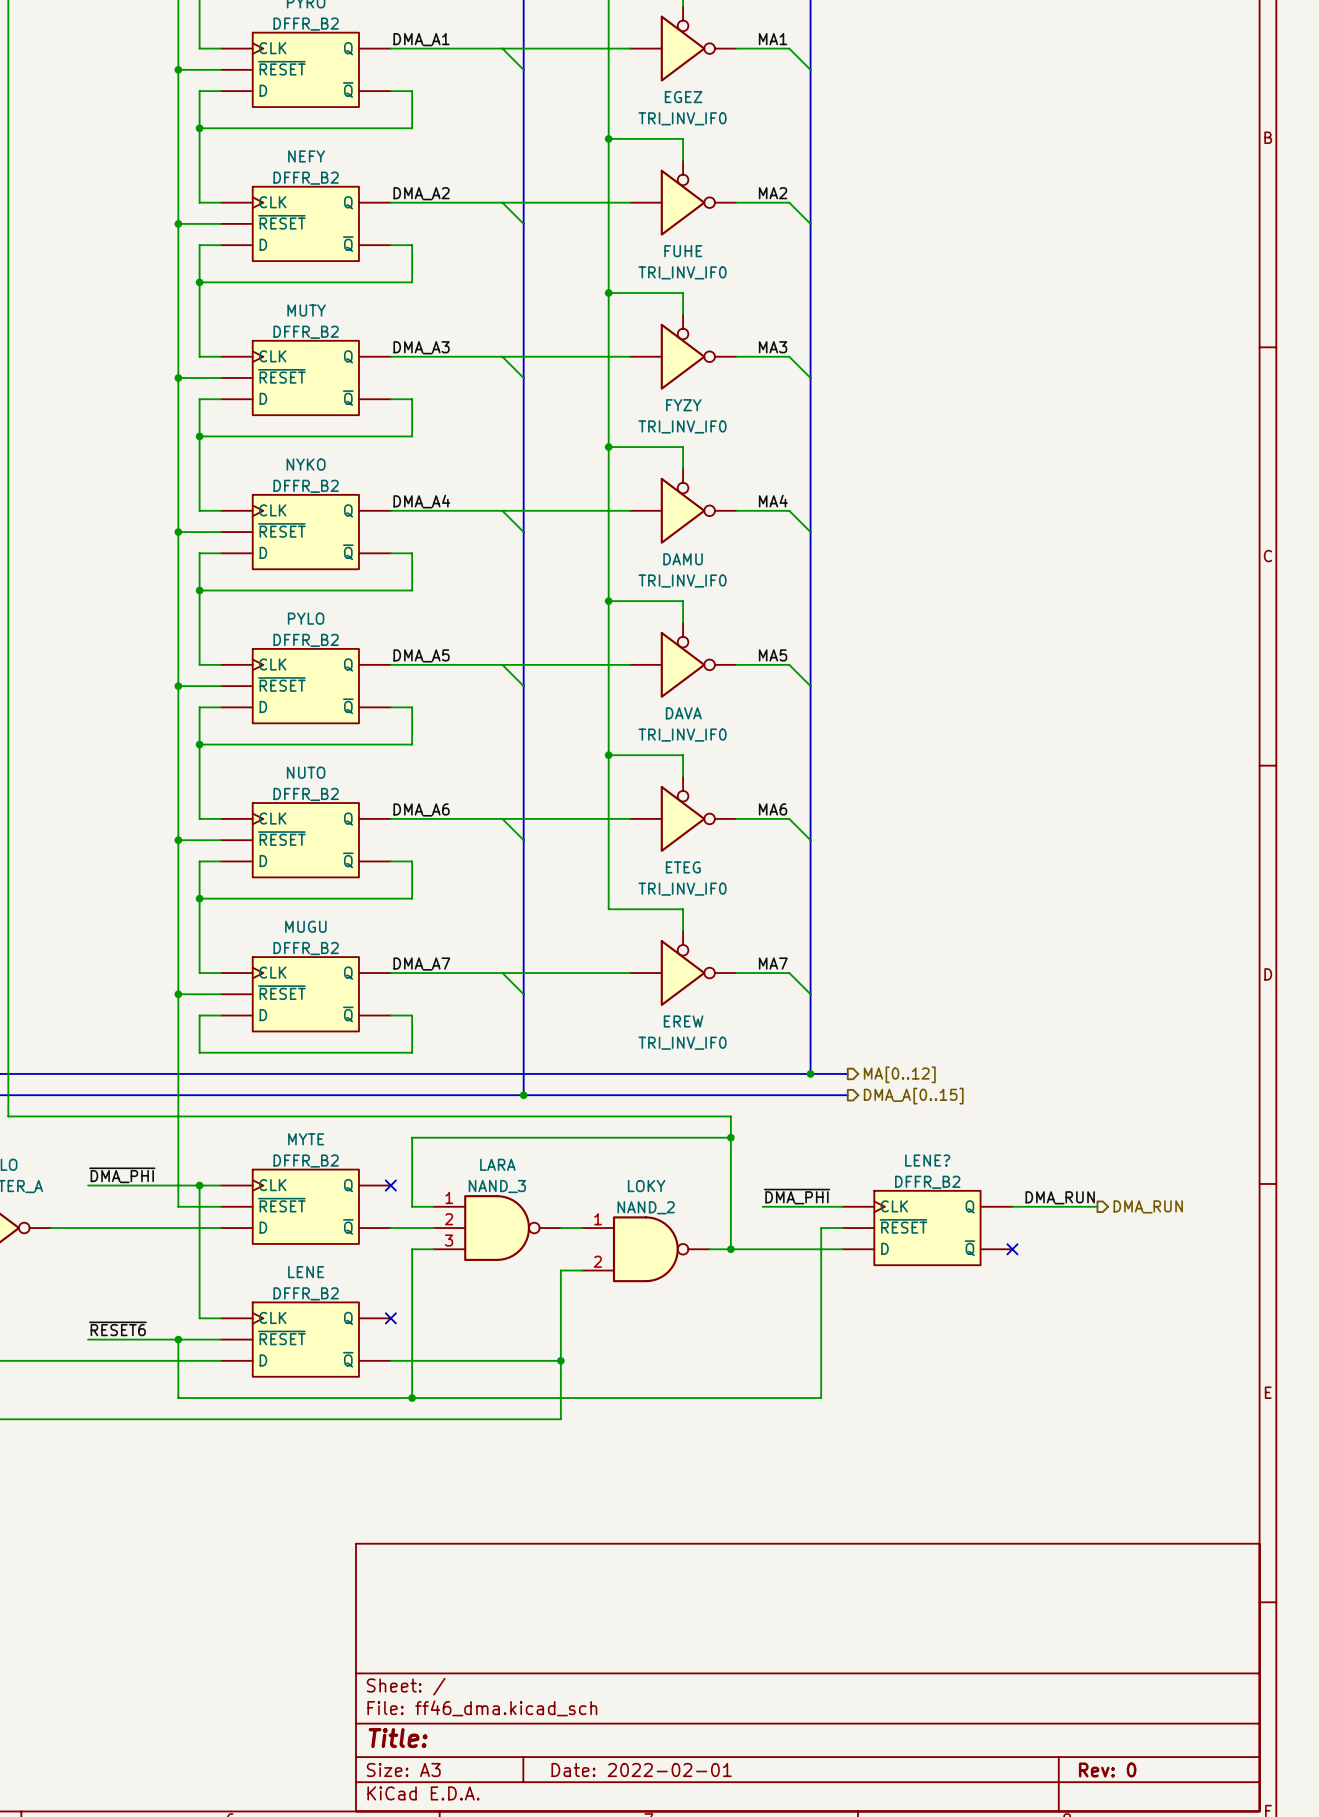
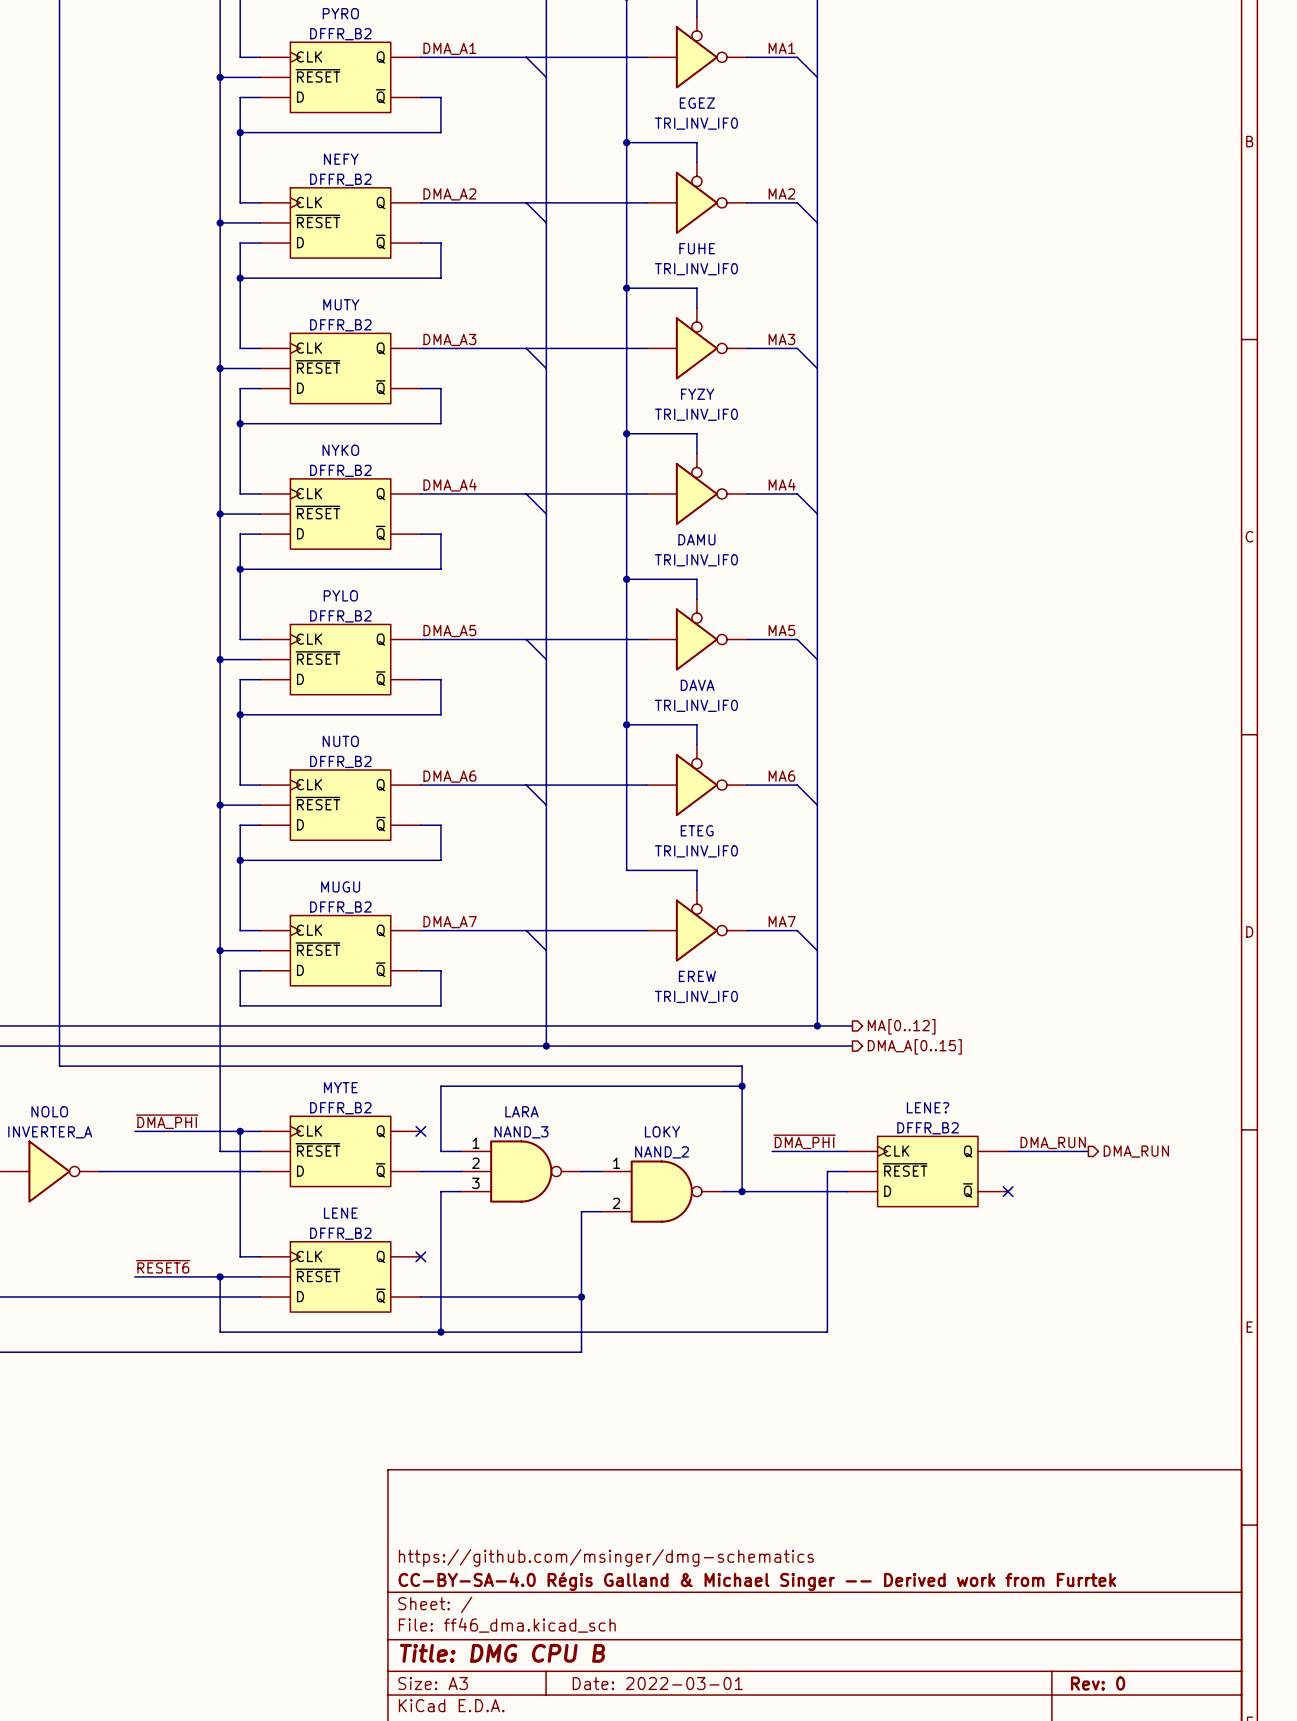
title block: none -> https://github.com/msinger/dmg-schematics (606, 1557)
title block: none -> CC-BY-SA-4.0 Régis Galland & Michael Singer -- Derived work from Furrtek (757, 1581)
title block: Title: (398, 1738) -> Title: DMG CPU B (502, 1653)
title block: Date: 2022-02-01 (641, 1770) -> Date: 2022-03-01 (657, 1683)

